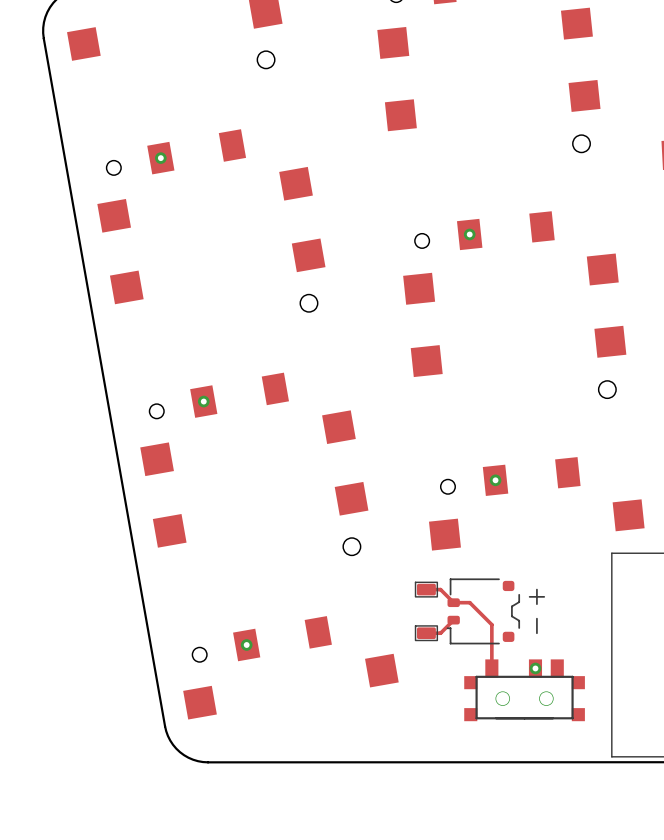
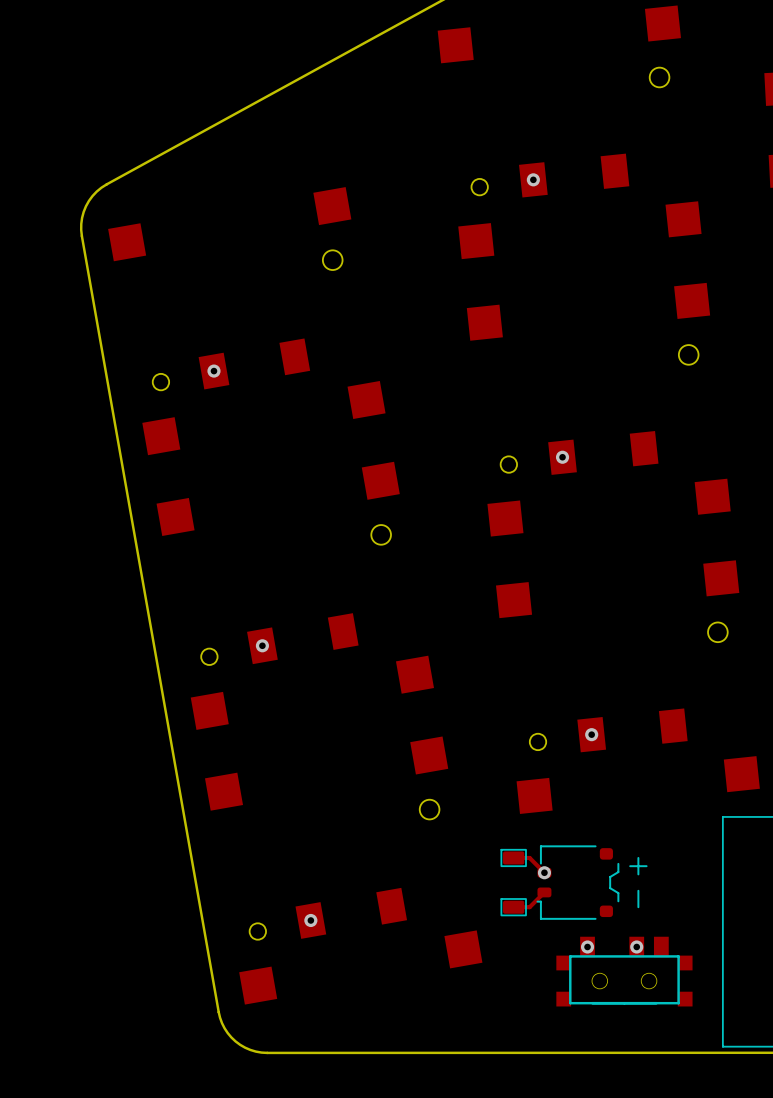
track: (453, 602) (469, 602) (491, 624) (491, 668) -> none
via: none -> (544, 872)
via: none -> (587, 946)

